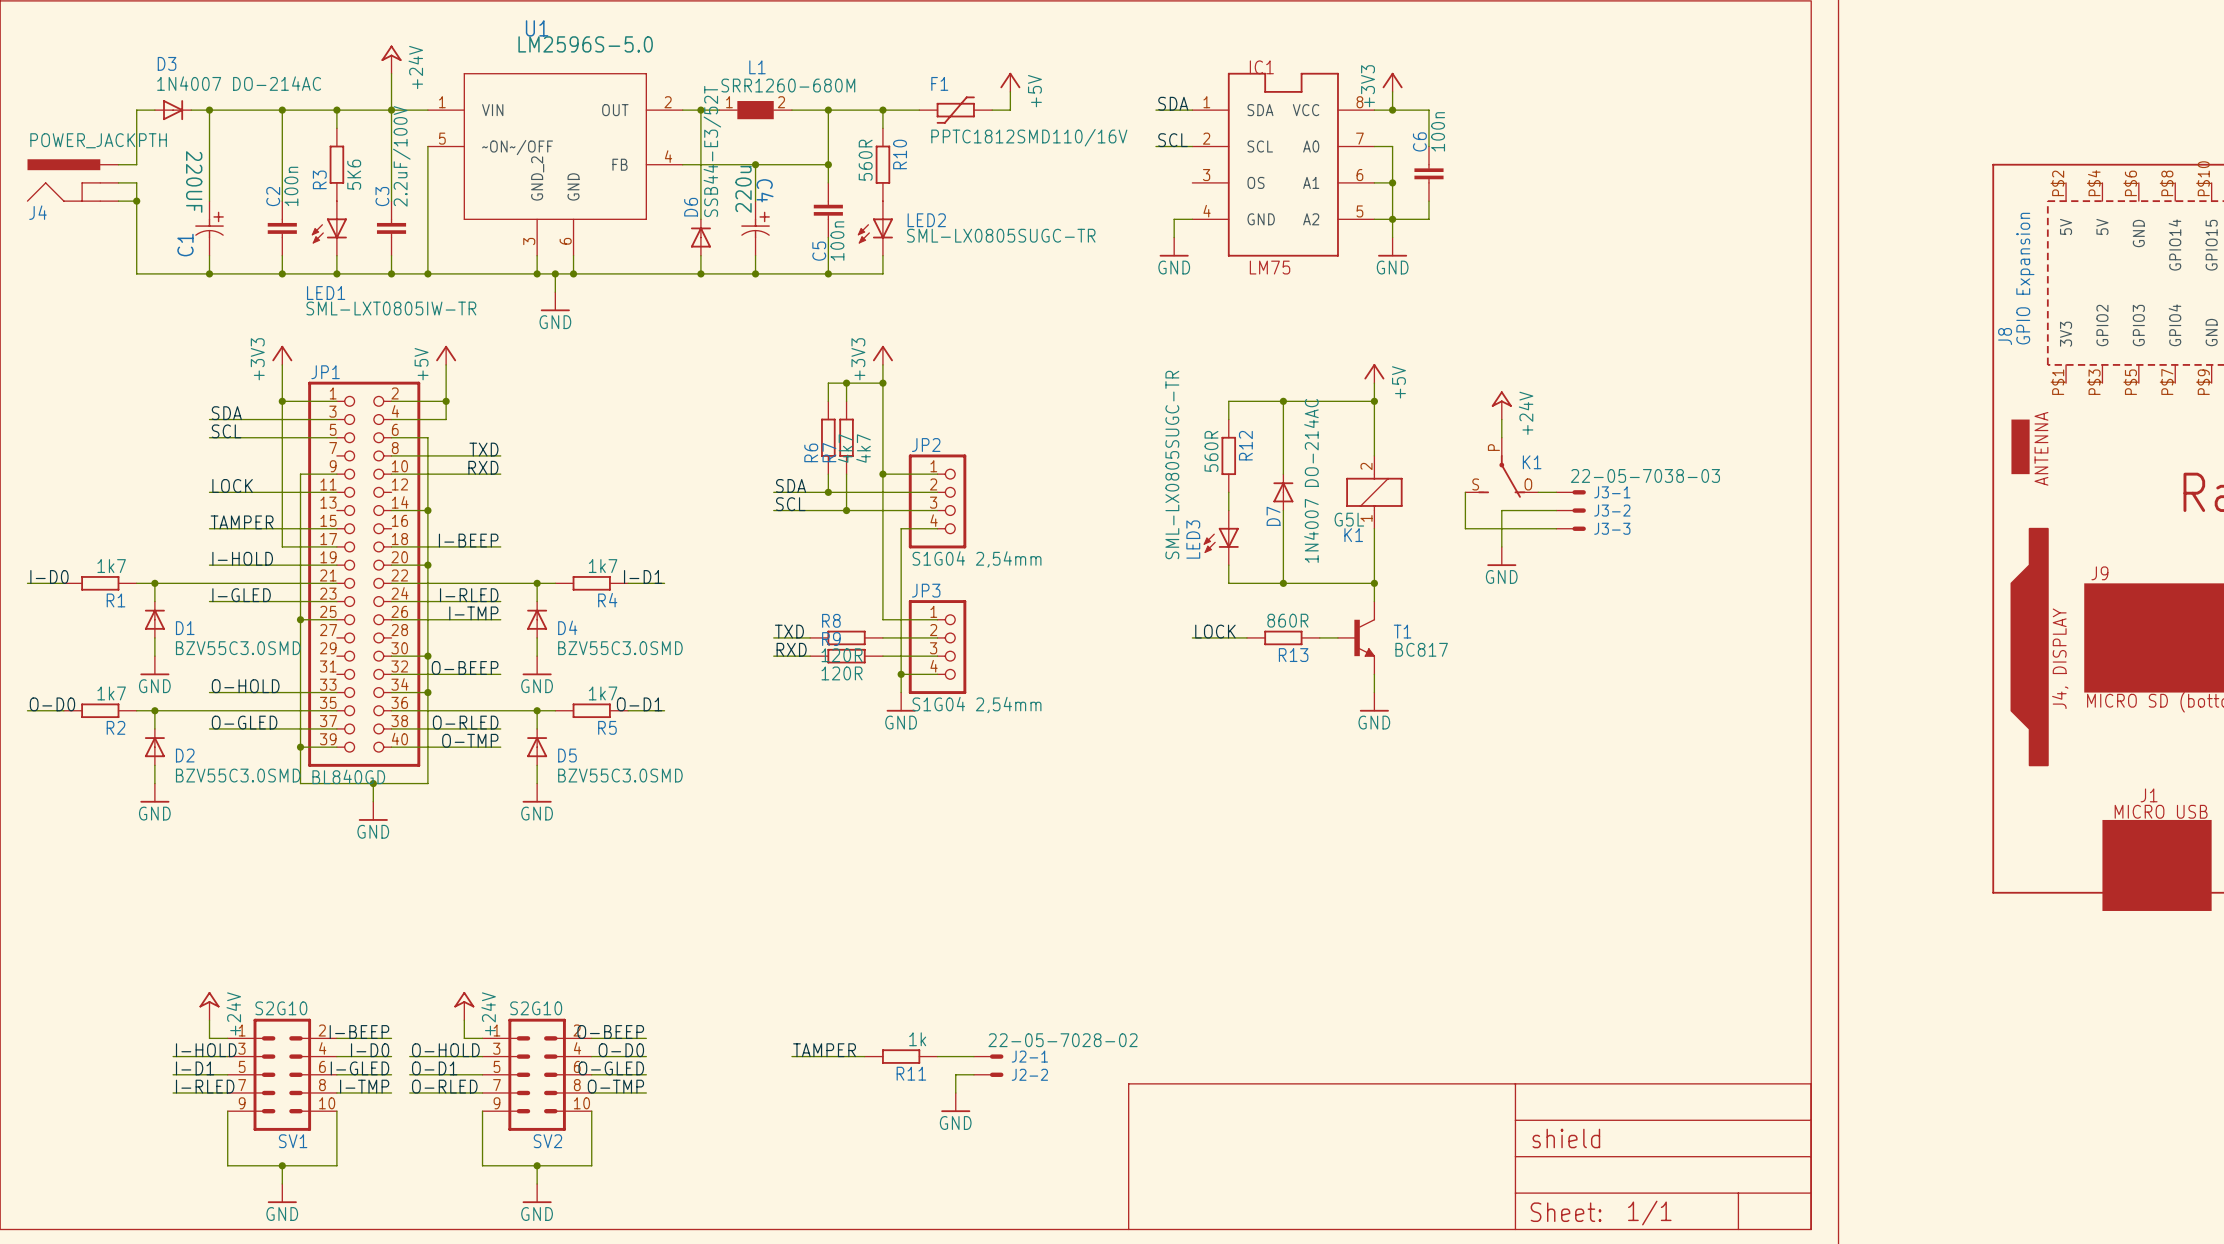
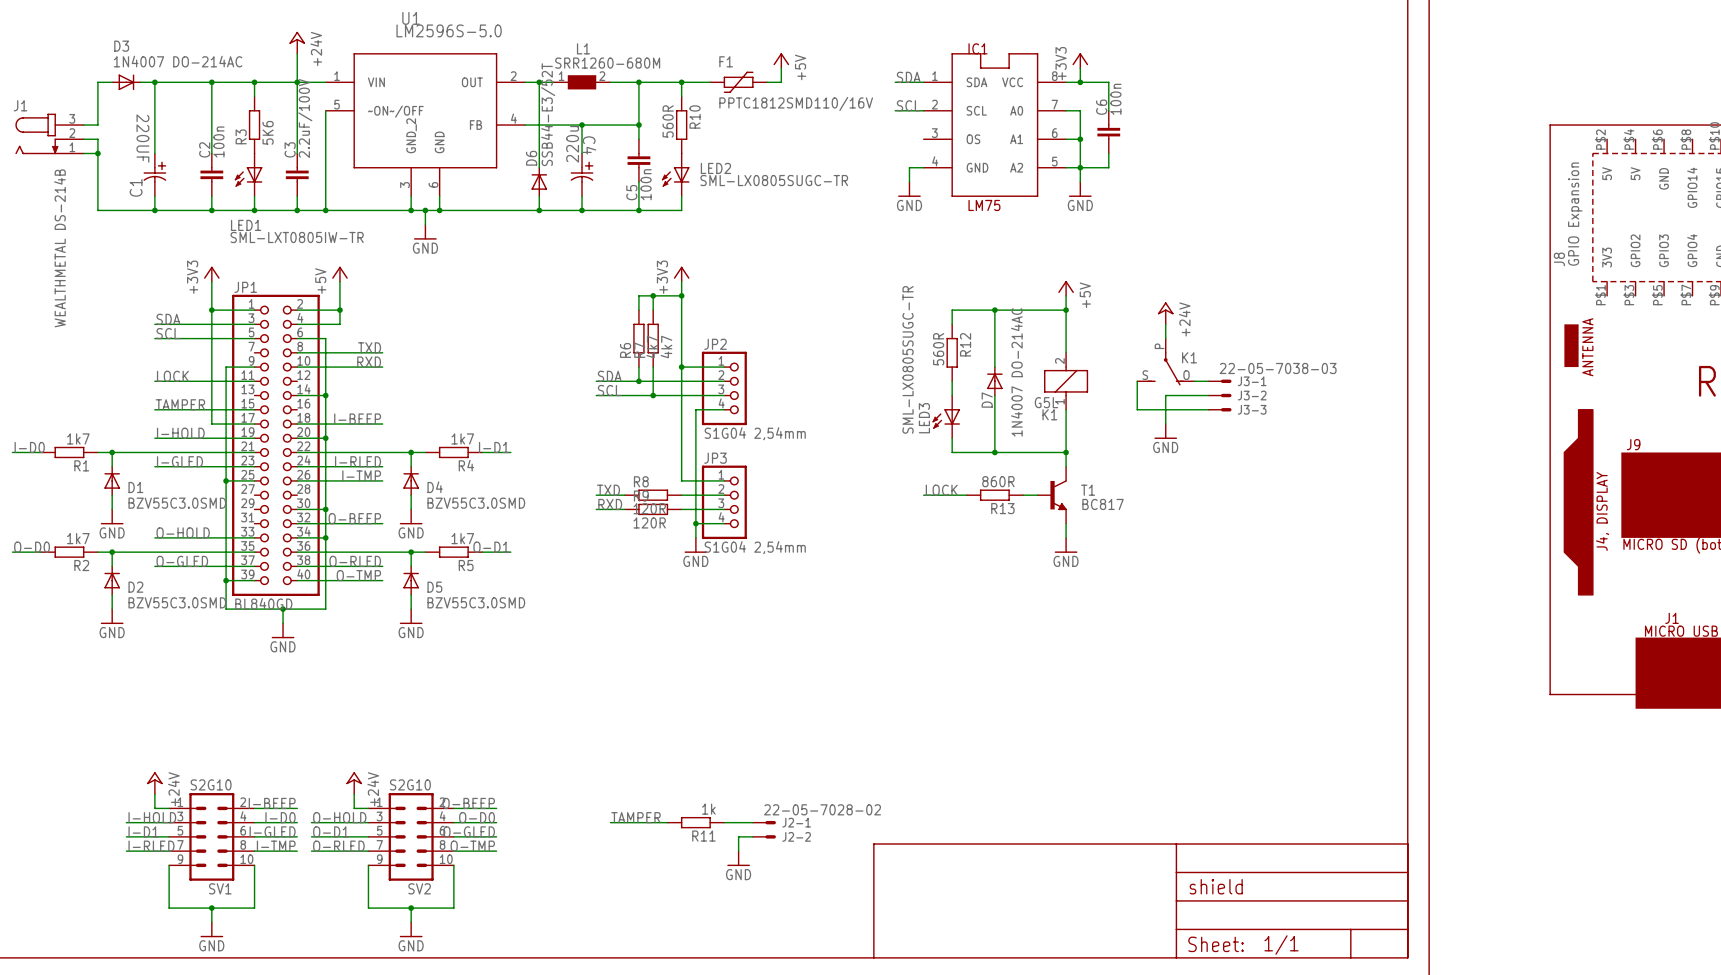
J1: none -> WEALTHMETAL DS-214B (49, 133)
J4: POWER_JACKPTH (72, 180) -> none

